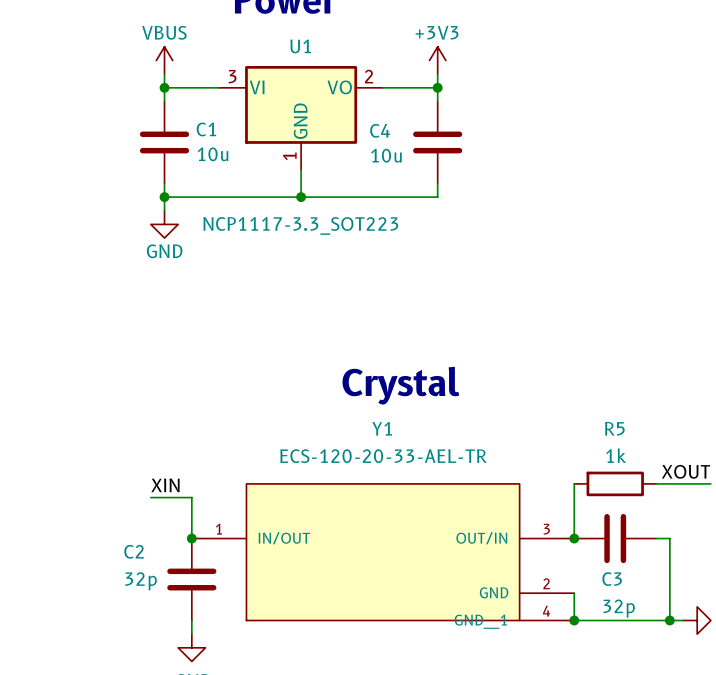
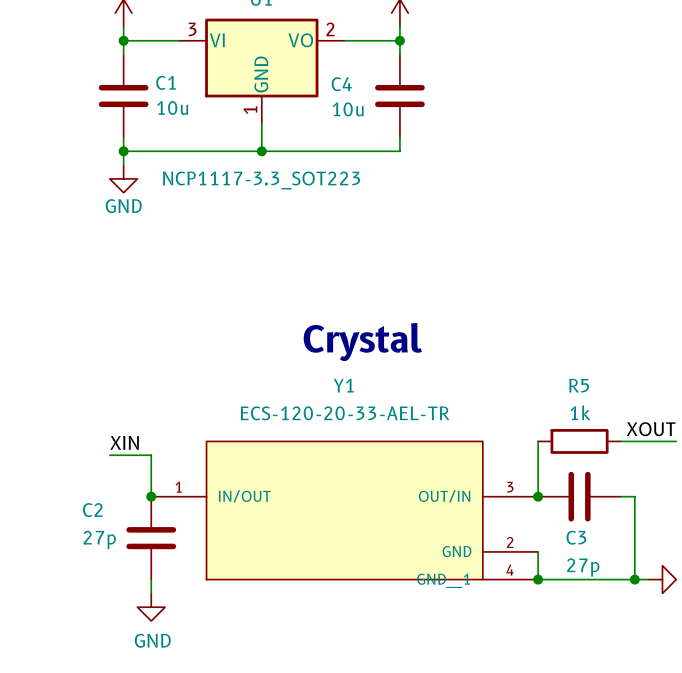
C2 value: 32p (141, 581) -> 27p (99, 539)
C3 value: 32p (619, 608) -> 27p (583, 567)

